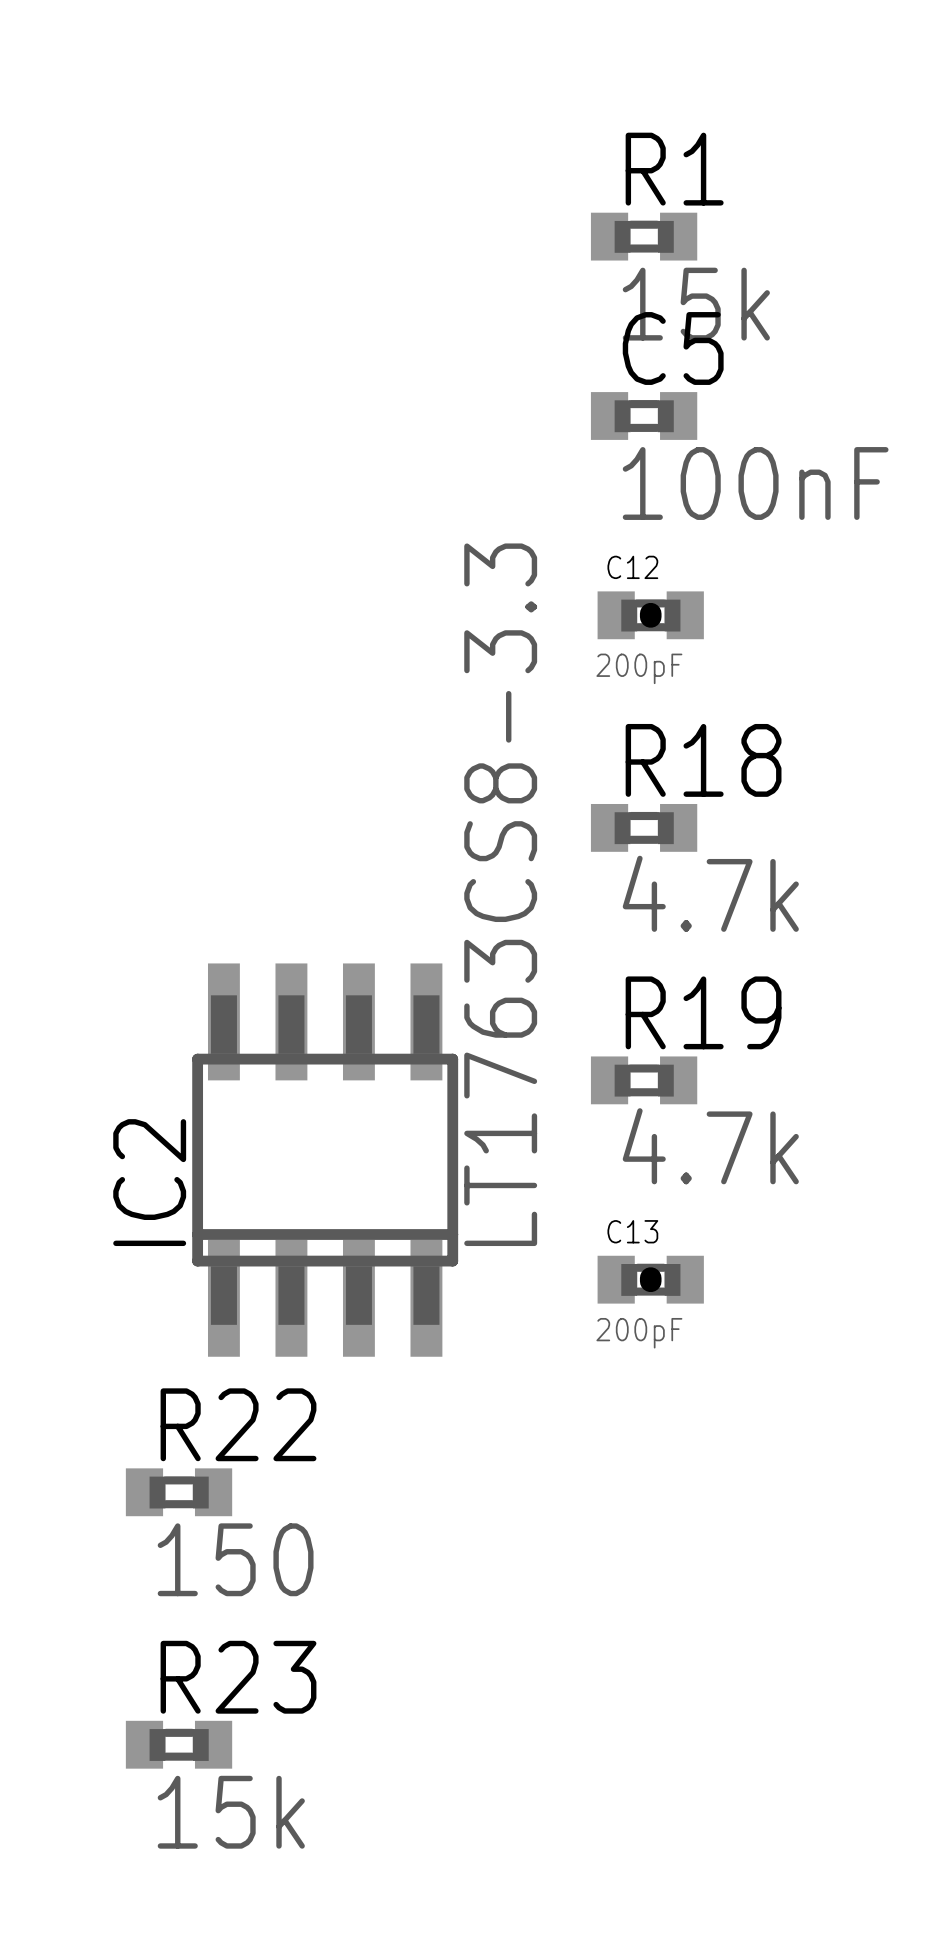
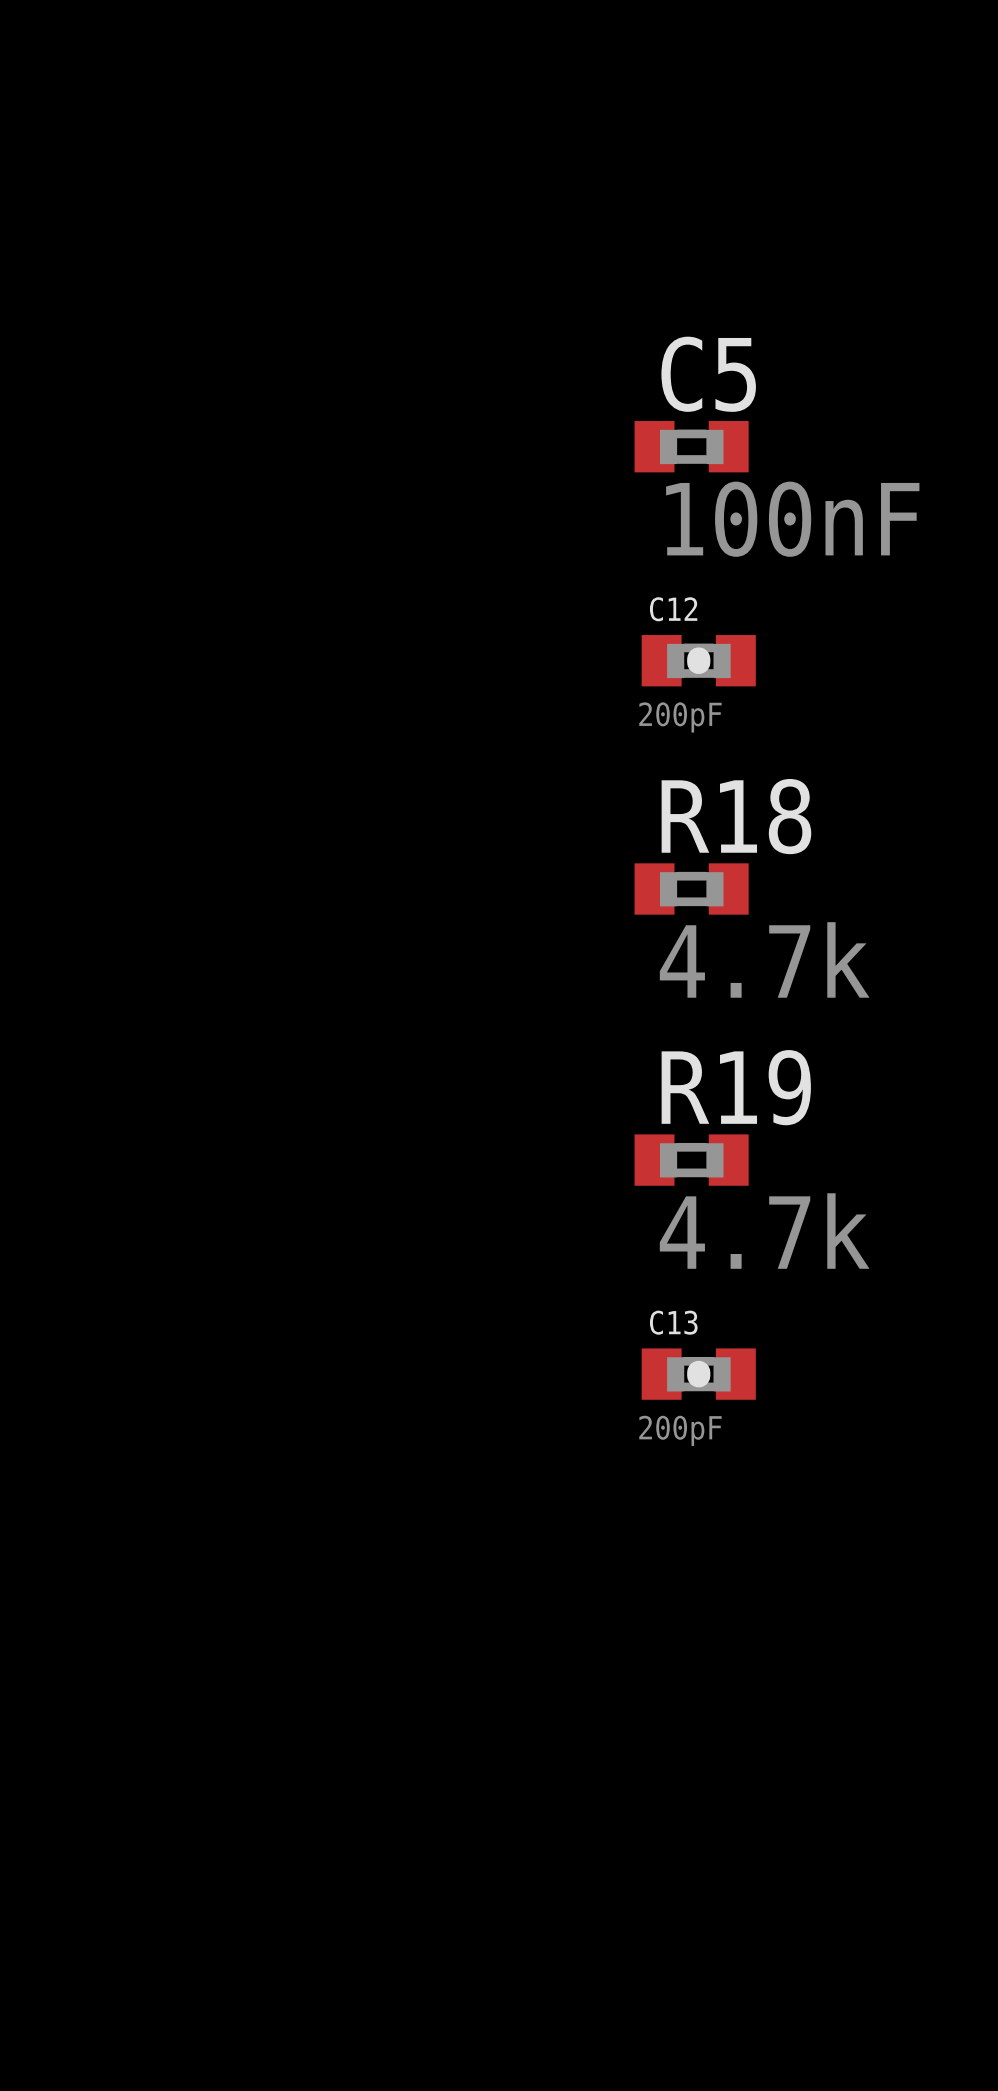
R1: 15k (644, 236) -> none
IC2: LT1763CS8-3.3 (325, 1160) -> none
R22: 150 (179, 1492) -> none
R23: 15k (179, 1744) -> none

